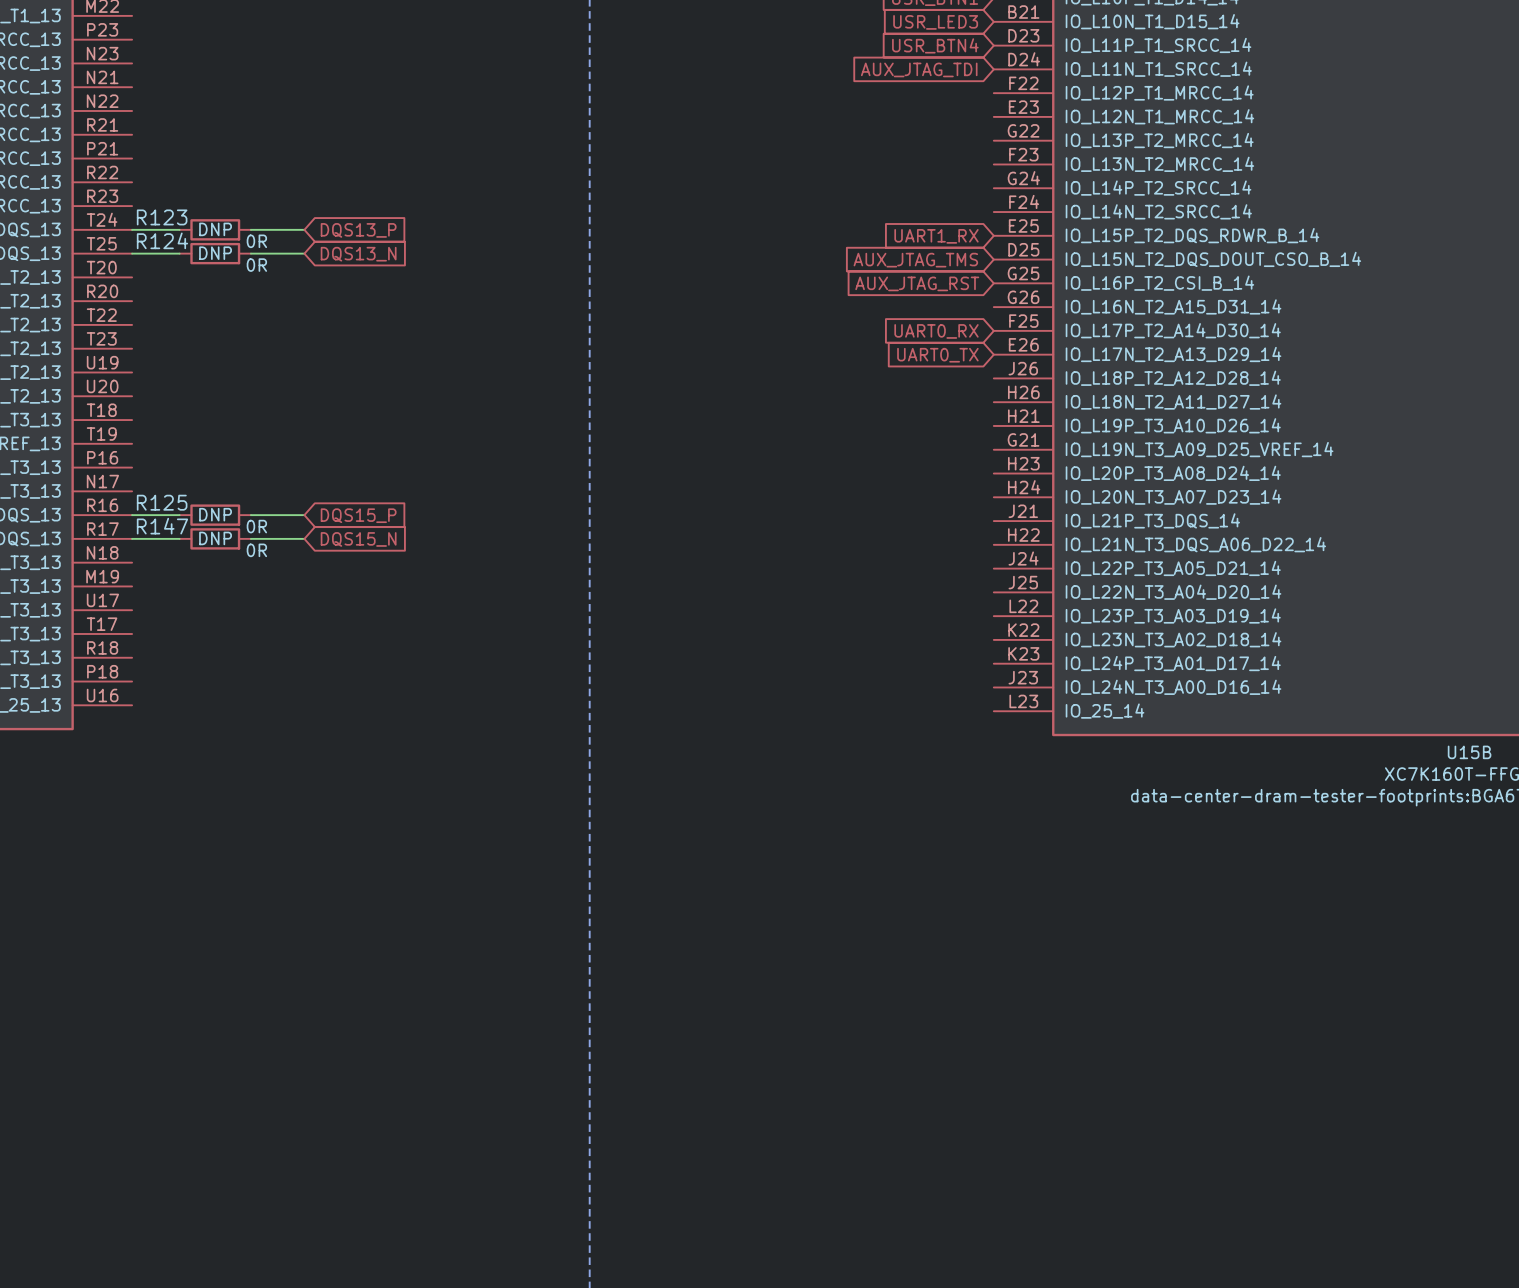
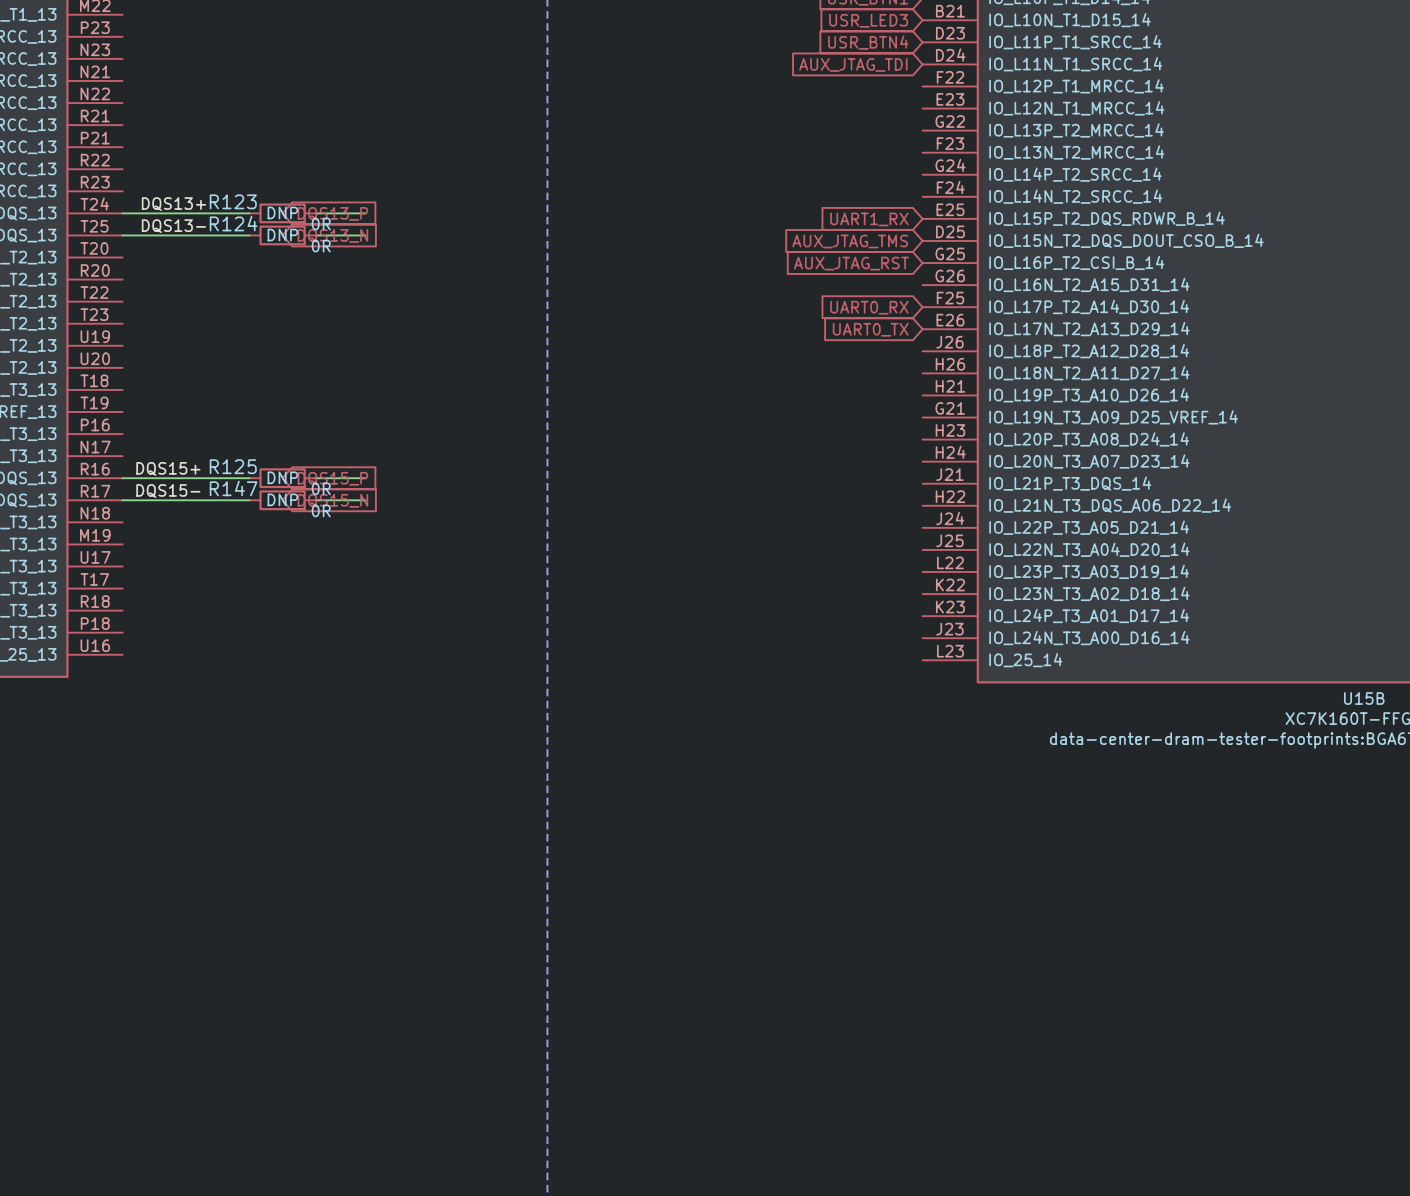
label: none -> DQS13+ (173, 204)
R123 position: (215, 229) -> (282, 213)
wire: none -> (315, 213) (365, 213)
label: none -> DQS13- (173, 226)
R124 position: (215, 253) -> (282, 235)
wire: none -> (315, 235) (365, 235)
label: none -> DQS15+ (168, 468)
R125 position: (215, 515) -> (282, 478)
wire: none -> (315, 478) (365, 478)
label: none -> DQS15- (168, 490)
R147 position: (215, 538) -> (282, 500)
wire: none -> (315, 500) (365, 500)

